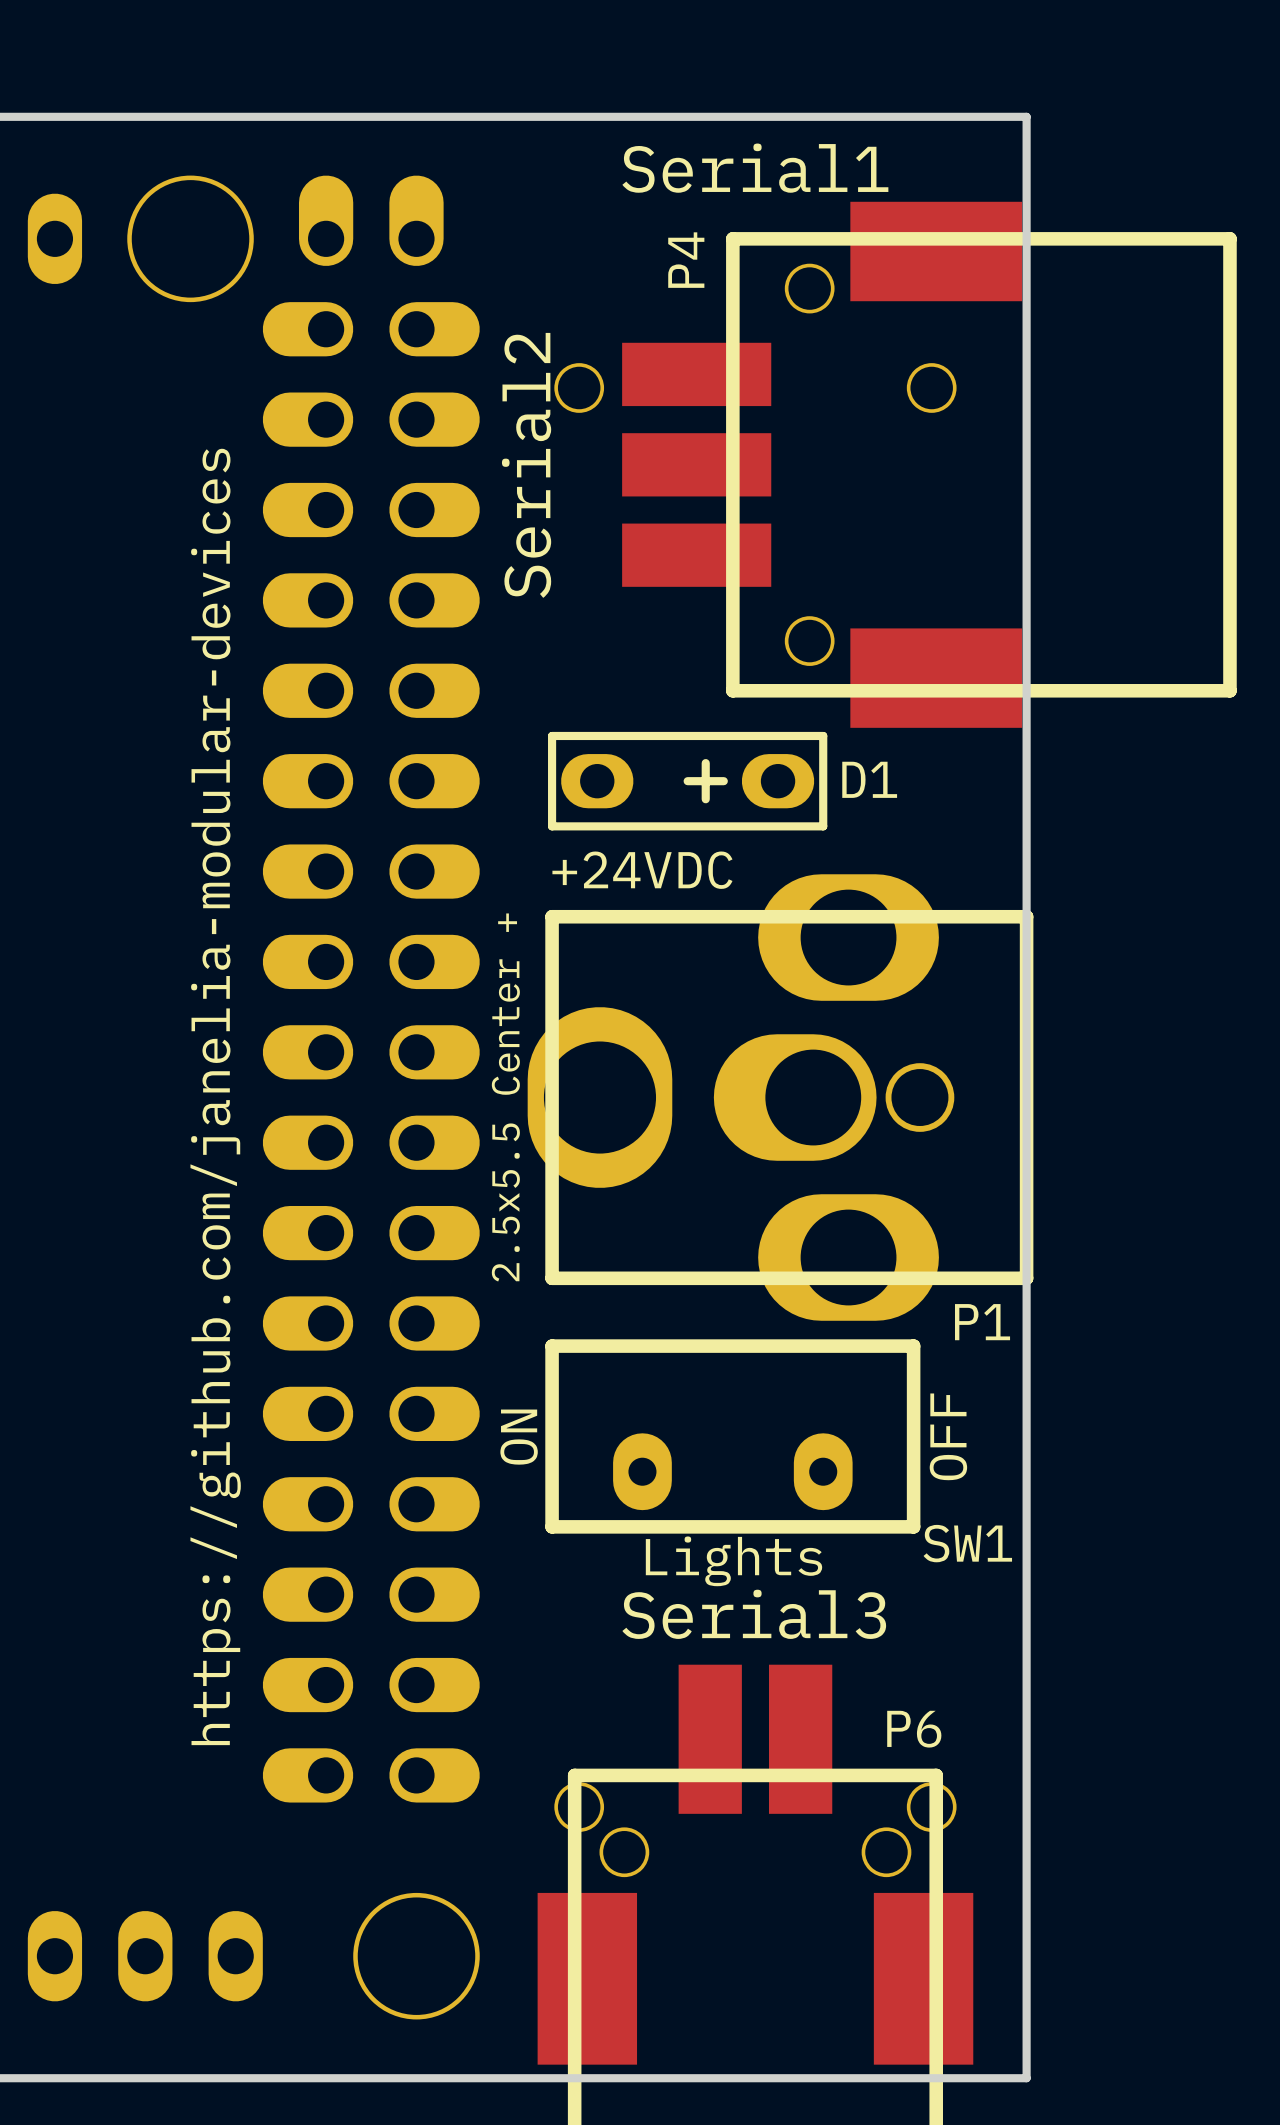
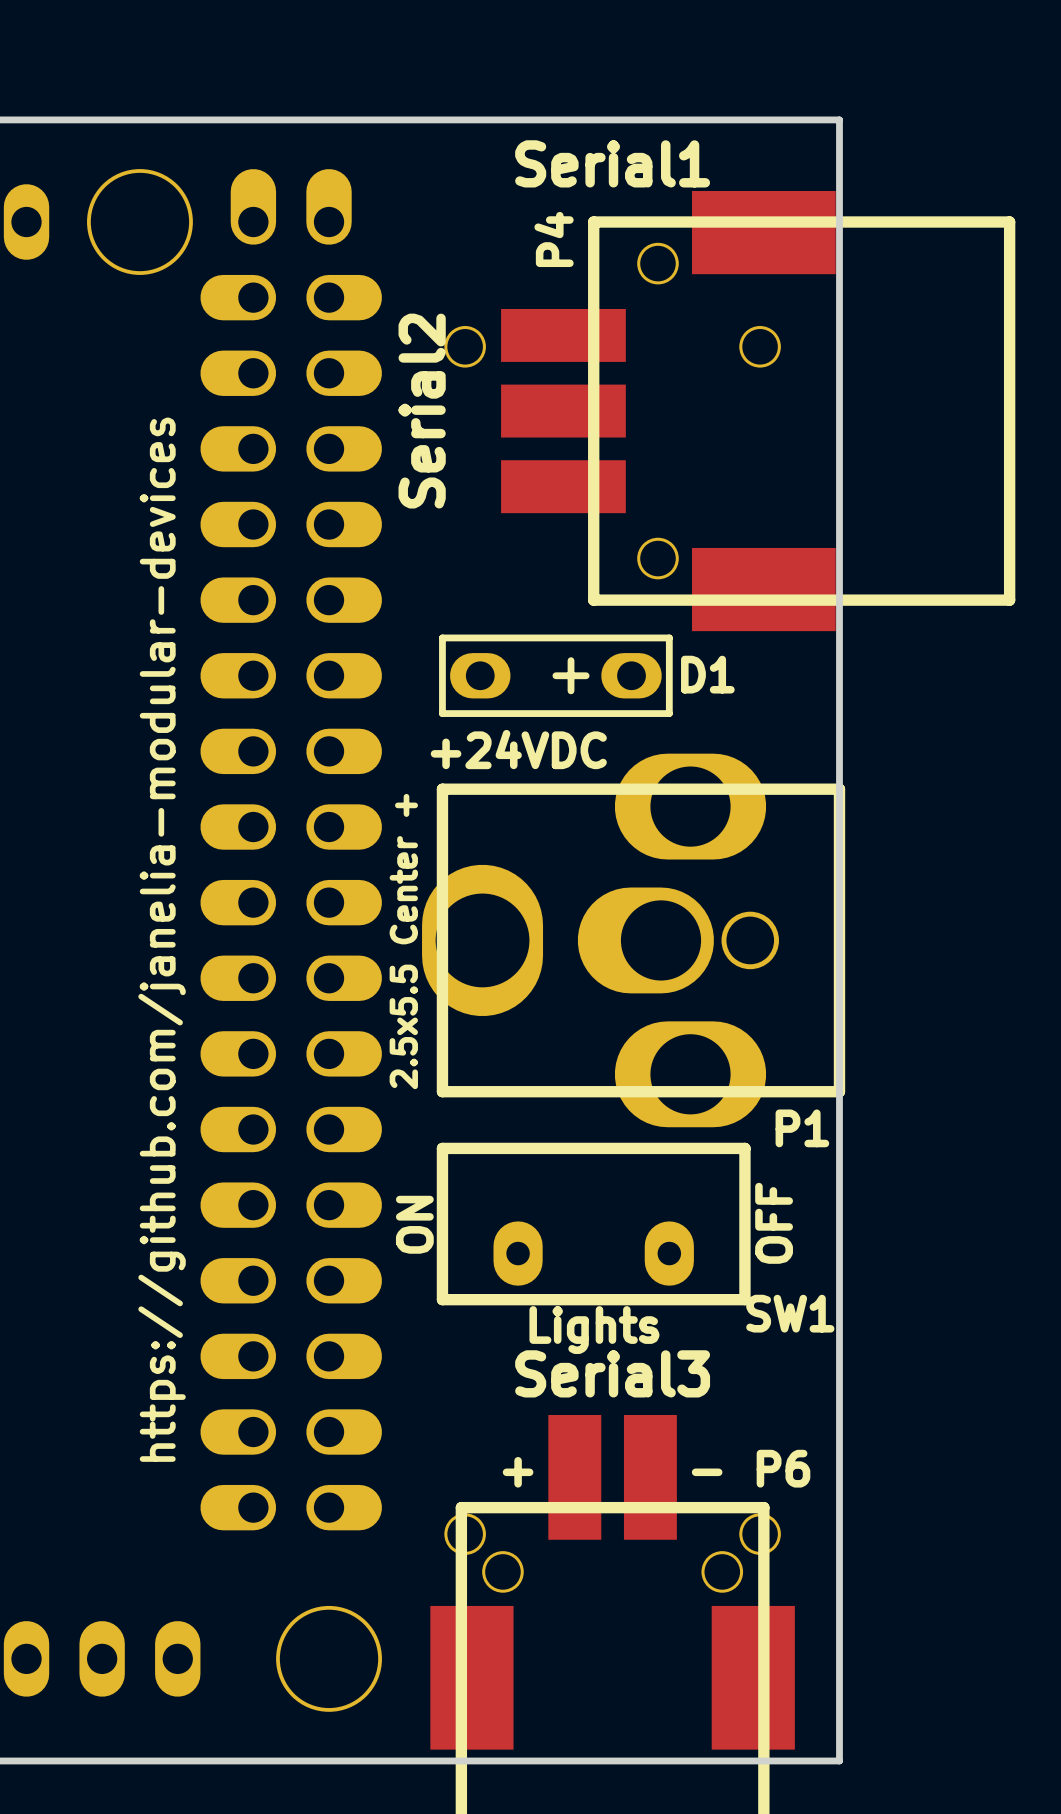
P6 name position: P6 (914, 1729) -> P6 (783, 1468)
text: none -> + (518, 1472)
text: none -> - (707, 1472)

